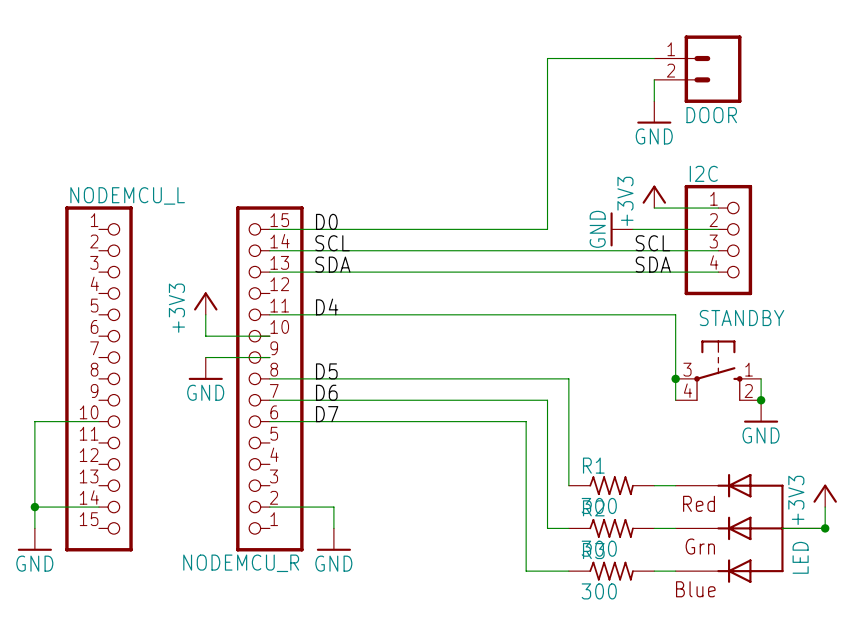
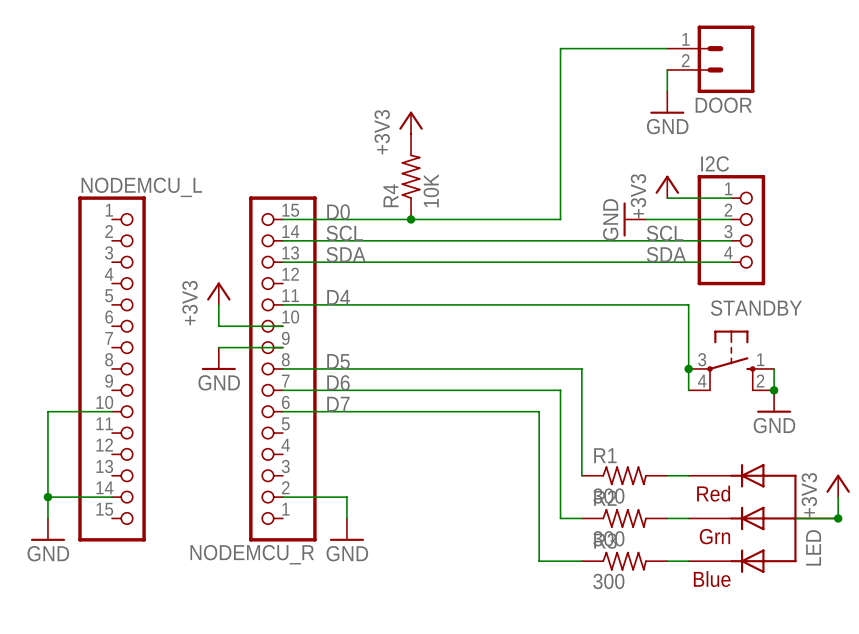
power symbol: none -> +3V3 (411, 122)
R4: none -> 10K (411, 176)
junction: none -> (411, 219)

